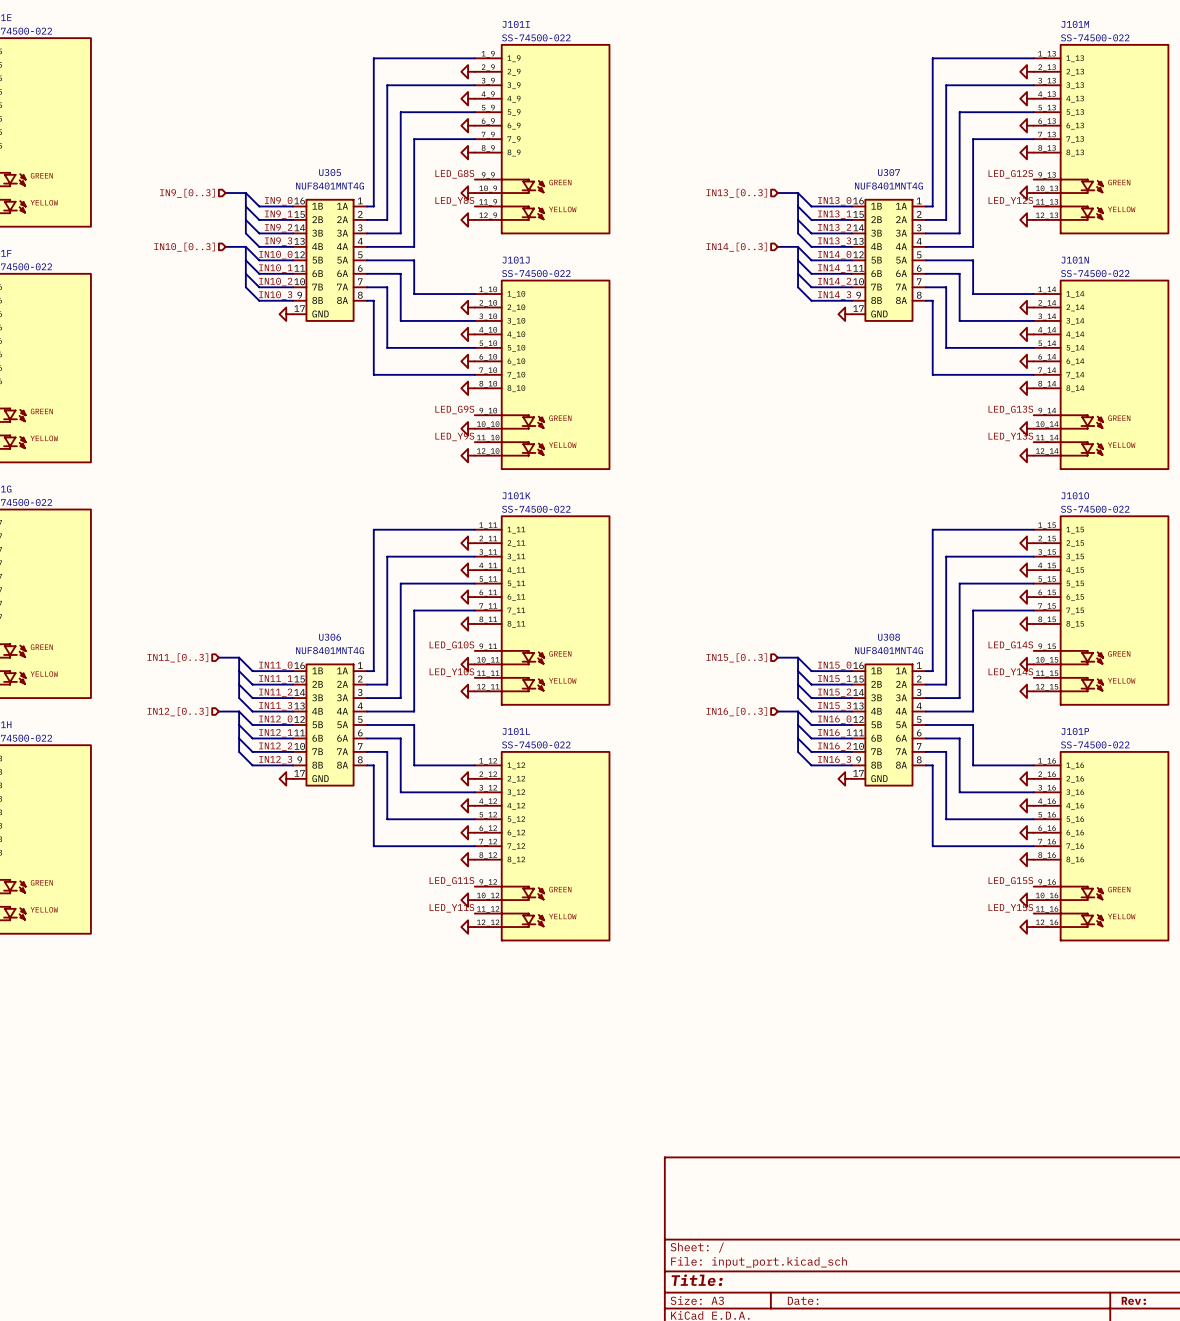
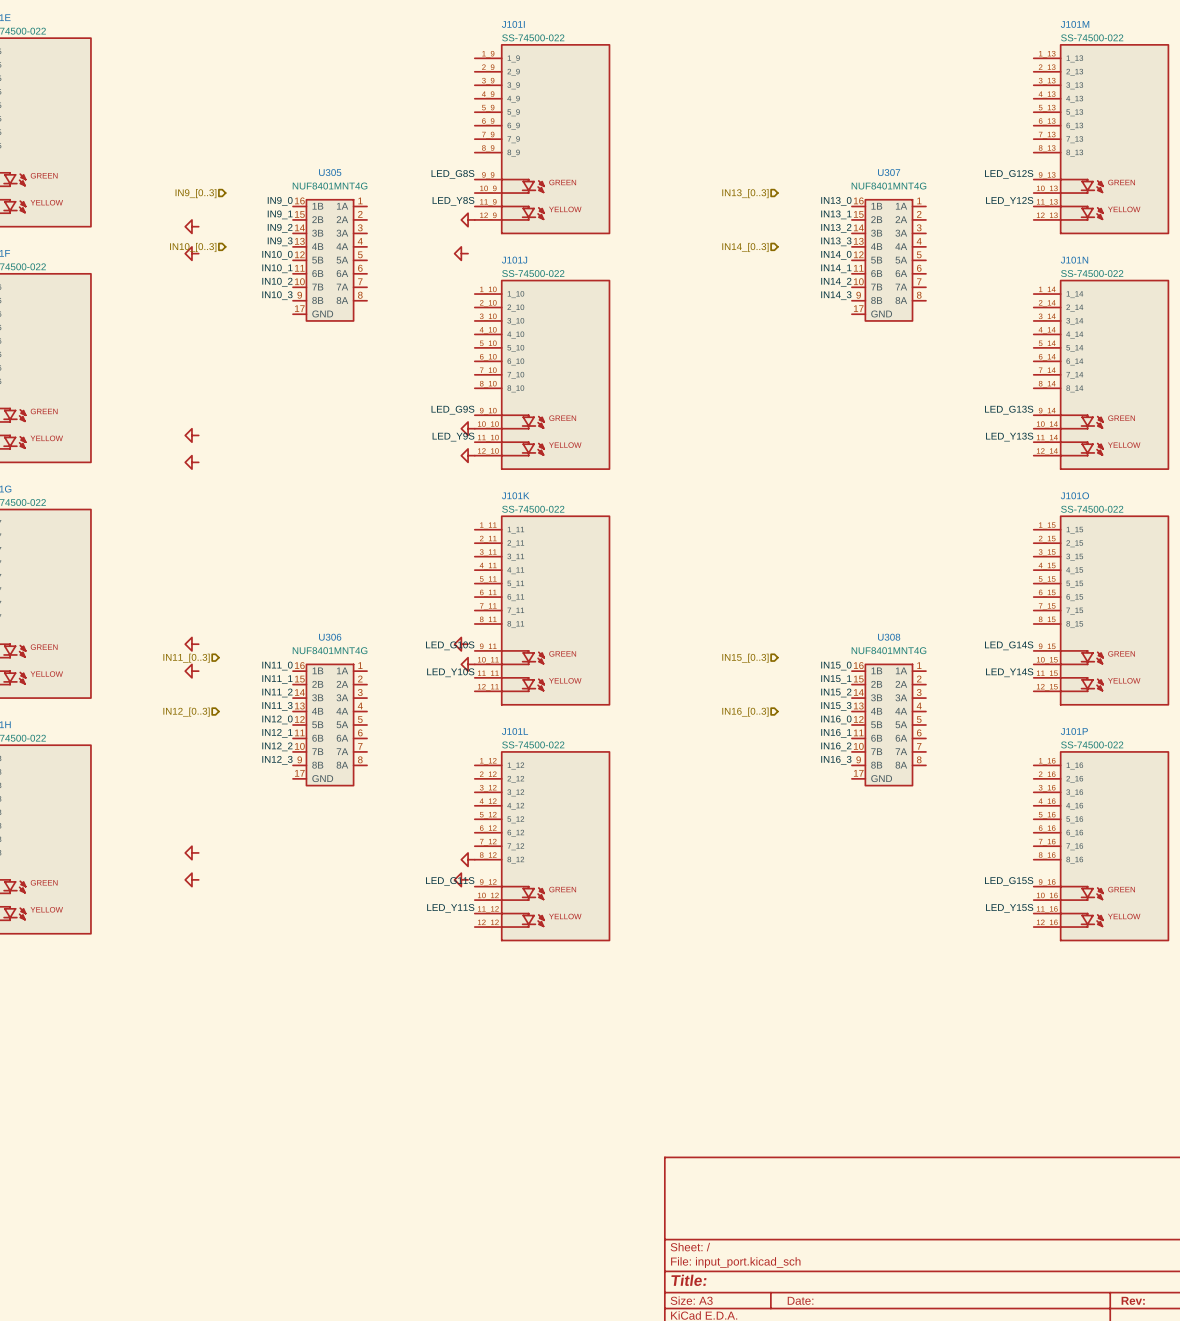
wire: (474, 58) (373, 58) (373, 206) (367, 206) -> none
wire: (1033, 58) (932, 58) (932, 206) (925, 206) -> none
power symbol: (468, 71) -> none
power symbol: (1026, 71) -> none
wire: (474, 85) (387, 85) (387, 219) (367, 219) -> none
wire: (1033, 85) (946, 85) (946, 219) (925, 219) -> none
power symbol: (468, 98) -> none
power symbol: (1026, 98) -> none
wire: (474, 112) (400, 112) (400, 233) (367, 233) -> none
wire: (1033, 112) (959, 112) (959, 233) (925, 233) -> none
power symbol: (468, 125) -> none
power symbol: (1026, 125) -> none
wire: (474, 139) (414, 139) (414, 246) (367, 246) -> none
wire: (1033, 139) (973, 139) (973, 246) (925, 246) -> none
power symbol: (468, 152) -> none
power symbol: (1026, 152) -> none
bus: (225, 193) (245, 193) (245, 233) -> none
wire: (245, 193) (259, 206) (292, 206) -> none
power symbol: (468, 193) -> none
bus: (777, 193) (798, 193) (798, 233) -> none
wire: (798, 193) (811, 206) (851, 206) -> none
power symbol: (1026, 193) -> none
wire: (245, 206) (259, 219) (292, 219) -> none
wire: (798, 206) (811, 219) (851, 219) -> none
wire: (245, 219) (259, 233) (292, 233) -> none
wire: (798, 219) (811, 233) (851, 233) -> none
power symbol: (1026, 219) -> none
power symbol: none -> (191, 226)
wire: (245, 233) (259, 246) (292, 246) -> none
wire: (798, 233) (811, 246) (851, 246) -> none
bus: (225, 246) (245, 246) (245, 287) -> none
wire: (245, 246) (259, 260) (292, 260) -> none
bus: (777, 246) (798, 246) (798, 287) -> none
wire: (798, 246) (811, 260) (851, 260) -> none
power symbol: none -> (191, 253)
power symbol: none -> (461, 253)
wire: (245, 260) (259, 273) (292, 273) -> none
wire: (367, 260) (414, 260) (414, 294) (474, 294) -> none
wire: (798, 260) (811, 273) (851, 273) -> none
wire: (925, 260) (973, 260) (973, 294) (1033, 294) -> none
wire: (245, 273) (259, 287) (292, 287) -> none
wire: (367, 273) (400, 273) (400, 320) (474, 320) -> none
wire: (798, 273) (811, 287) (851, 287) -> none
wire: (925, 273) (959, 273) (959, 320) (1033, 320) -> none
wire: (245, 287) (259, 300) (292, 300) -> none
wire: (367, 287) (387, 287) (387, 347) (474, 347) -> none
wire: (798, 287) (811, 300) (851, 300) -> none
wire: (925, 287) (946, 287) (946, 347) (1033, 347) -> none
wire: (367, 300) (373, 300) (373, 374) (474, 374) -> none
wire: (925, 300) (932, 300) (932, 374) (1033, 374) -> none
power symbol: (468, 307) -> none
power symbol: (1026, 307) -> none
power symbol: (286, 314) -> none
power symbol: (845, 314) -> none
power symbol: (468, 334) -> none
power symbol: (1026, 334) -> none
power symbol: (468, 361) -> none
power symbol: (1026, 361) -> none
power symbol: (468, 388) -> none
power symbol: (1026, 388) -> none
power symbol: (1026, 428) -> none
power symbol: none -> (191, 435)
power symbol: (1026, 455) -> none
power symbol: none -> (191, 462)
wire: (474, 529) (373, 529) (373, 671) (367, 671) -> none
wire: (1033, 529) (932, 529) (932, 671) (925, 671) -> none
power symbol: (468, 543) -> none
power symbol: (1026, 543) -> none
wire: (474, 556) (387, 556) (387, 684) (367, 684) -> none
wire: (1033, 556) (946, 556) (946, 684) (925, 684) -> none
power symbol: (468, 570) -> none
power symbol: (1026, 570) -> none
wire: (474, 583) (400, 583) (400, 698) (367, 698) -> none
wire: (1033, 583) (959, 583) (959, 698) (925, 698) -> none
power symbol: (468, 597) -> none
power symbol: (1026, 597) -> none
wire: (474, 610) (414, 610) (414, 711) (367, 711) -> none
wire: (1033, 610) (973, 610) (973, 711) (925, 711) -> none
power symbol position: (468, 623) -> (461, 644)
power symbol: (1026, 623) -> none
power symbol: none -> (191, 644)
bus: (218, 657) (239, 657) (239, 698) -> none
wire: (239, 657) (252, 671) (292, 671) -> none
bus: (777, 657) (798, 657) (798, 698) -> none
wire: (798, 657) (811, 671) (851, 671) -> none
power symbol: (1026, 664) -> none
power symbol: none -> (191, 671)
wire: (239, 671) (252, 684) (292, 684) -> none
wire: (798, 671) (811, 684) (851, 684) -> none
wire: (239, 684) (252, 698) (292, 698) -> none
wire: (798, 684) (811, 698) (851, 698) -> none
power symbol: (468, 691) -> none
power symbol: (1026, 691) -> none
wire: (239, 698) (252, 711) (292, 711) -> none
wire: (798, 698) (811, 711) (851, 711) -> none
bus: (218, 711) (239, 711) (239, 751) -> none
wire: (239, 711) (252, 725) (292, 725) -> none
bus: (777, 711) (798, 711) (798, 751) -> none
wire: (798, 711) (811, 725) (851, 725) -> none
wire: (239, 725) (252, 738) (292, 738) -> none
wire: (367, 725) (414, 725) (414, 765) (474, 765) -> none
wire: (798, 725) (811, 738) (851, 738) -> none
wire: (925, 725) (973, 725) (973, 765) (1033, 765) -> none
wire: (239, 738) (252, 751) (292, 751) -> none
wire: (367, 738) (400, 738) (400, 792) (474, 792) -> none
wire: (798, 738) (811, 751) (851, 751) -> none
wire: (925, 738) (959, 738) (959, 792) (1033, 792) -> none
wire: (239, 751) (252, 765) (292, 765) -> none
wire: (367, 751) (387, 751) (387, 819) (474, 819) -> none
wire: (798, 751) (811, 765) (851, 765) -> none
wire: (925, 751) (946, 751) (946, 819) (1033, 819) -> none
wire: (367, 765) (373, 765) (373, 846) (474, 846) -> none
wire: (925, 765) (932, 765) (932, 846) (1033, 846) -> none
power symbol: (286, 778) -> none
power symbol: (468, 778) -> none
power symbol: (845, 778) -> none
power symbol: (1026, 778) -> none
power symbol: (468, 805) -> none
power symbol: (1026, 805) -> none
power symbol: (468, 832) -> none
power symbol: (1026, 832) -> none
power symbol: none -> (191, 852)
power symbol: (1026, 859) -> none
power symbol: none -> (191, 879)
power symbol position: (468, 900) -> (461, 879)
power symbol: (1026, 900) -> none
power symbol: (468, 927) -> none
power symbol: (1026, 927) -> none

